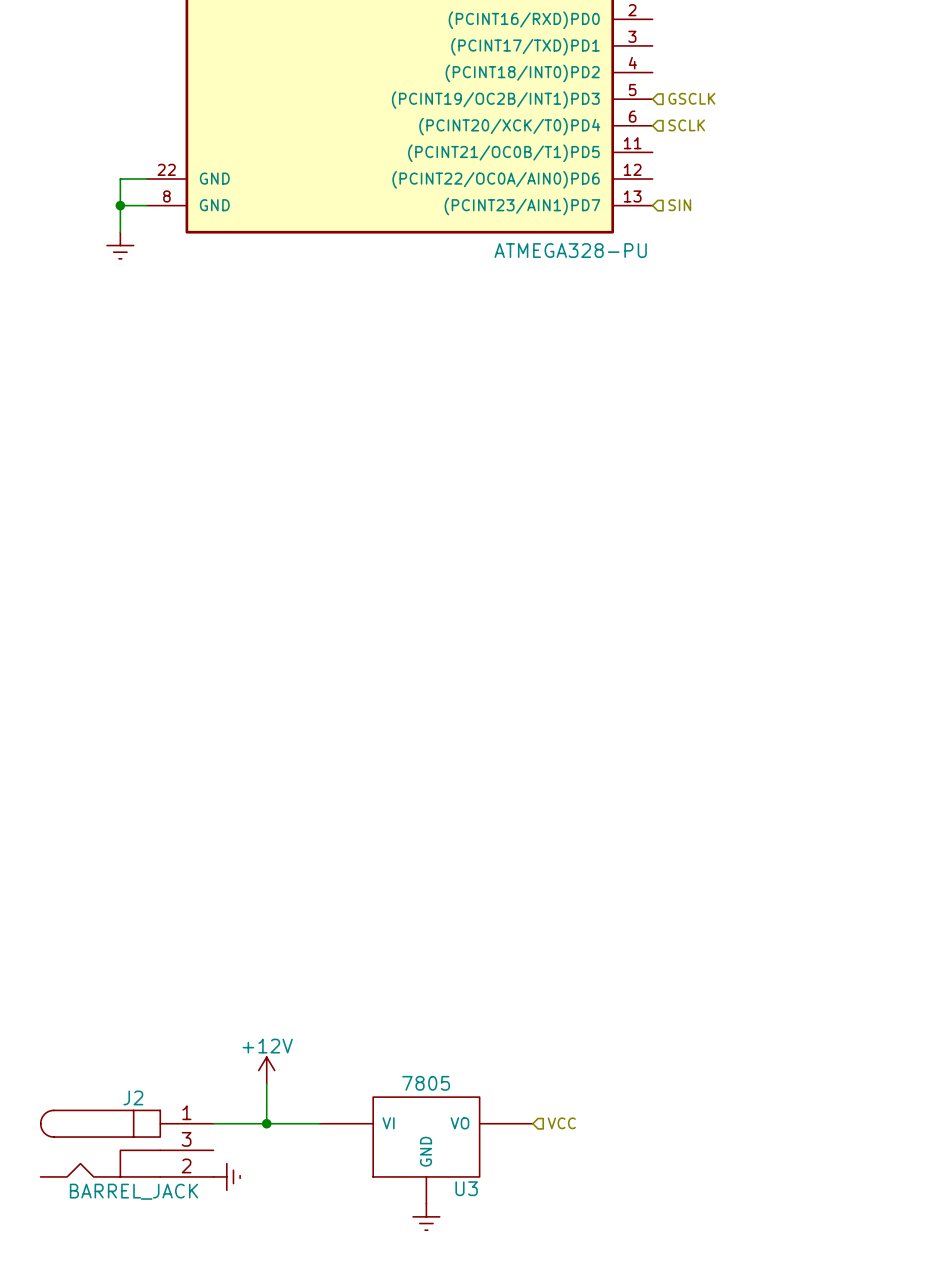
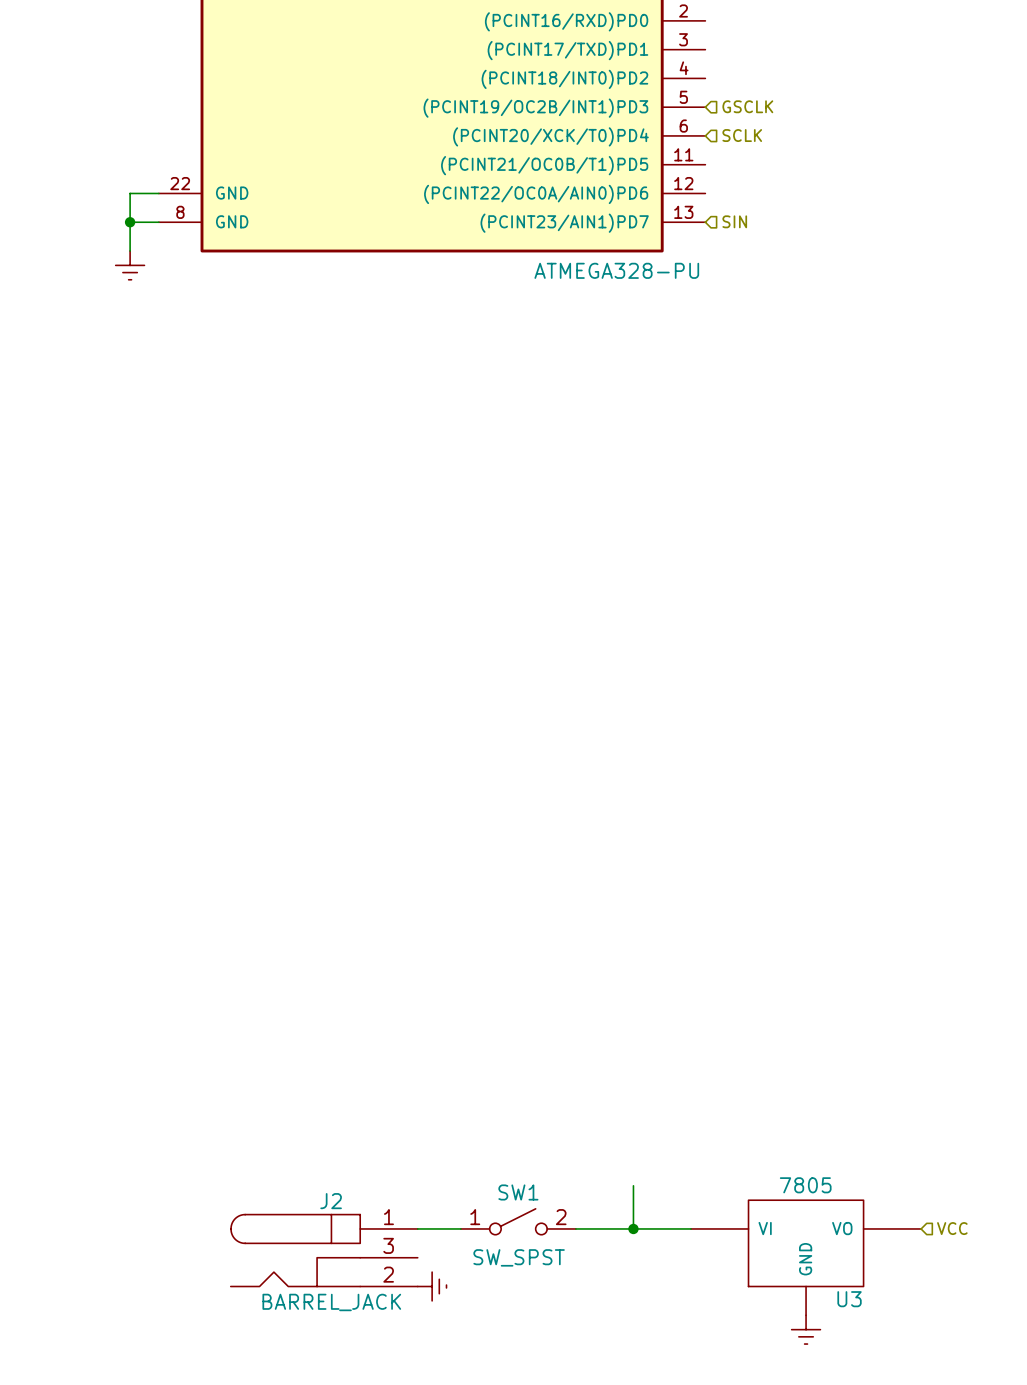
power symbol: +12V (266, 1070) -> none
wire: (266, 1083) (266, 1123) -> none
wire: none -> (633, 1185) (633, 1228)
junction: (266, 1123) -> none
hierarchical label: VCC (561, 1123) -> none
SW1: none -> SW_SPST (518, 1221)
hierarchical label: none -> VCC (952, 1228)
wire: none -> (417, 1228) (460, 1228)
wire: none -> (575, 1228) (690, 1228)
junction: none -> (633, 1228)
J2 position: (127, 1143) -> (324, 1250)
U3 position: (426, 1150) -> (806, 1257)
power symbol: (226, 1176) -> none
power symbol rotation: 0° (426, 1216) -> 90° counterclockwise (432, 1286)
power symbol position: (426, 1216) -> (432, 1286)
power symbol: none -> (806, 1329)

